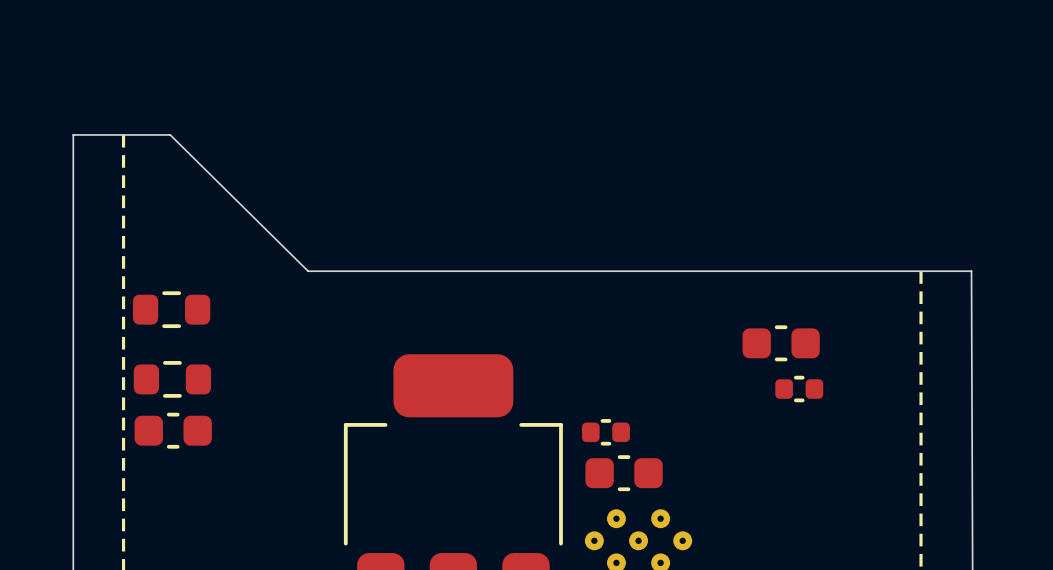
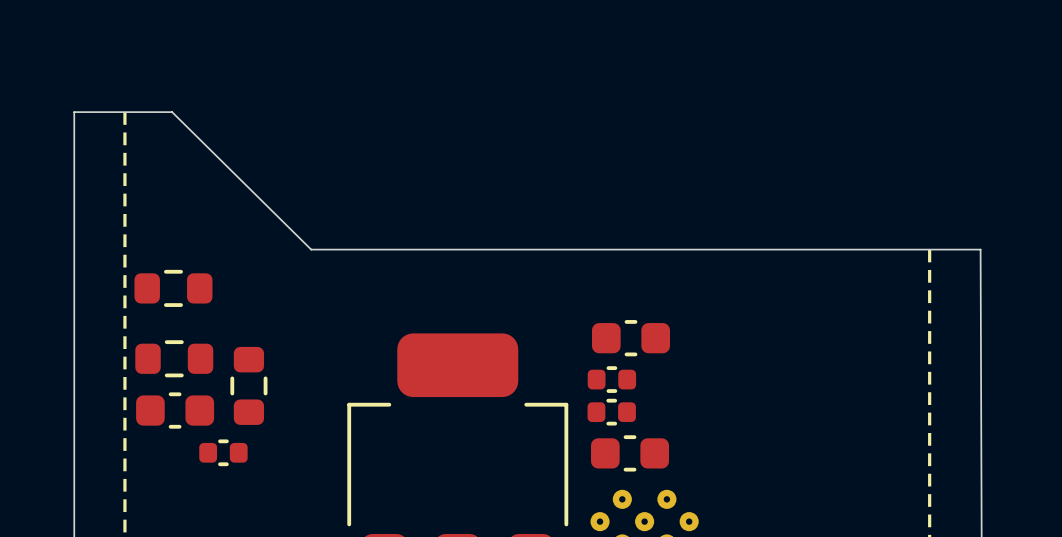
part position: (781, 343) -> (631, 338)
part position: (799, 389) -> (611, 379)
part: none -> (248, 385)
part: none -> (223, 452)

